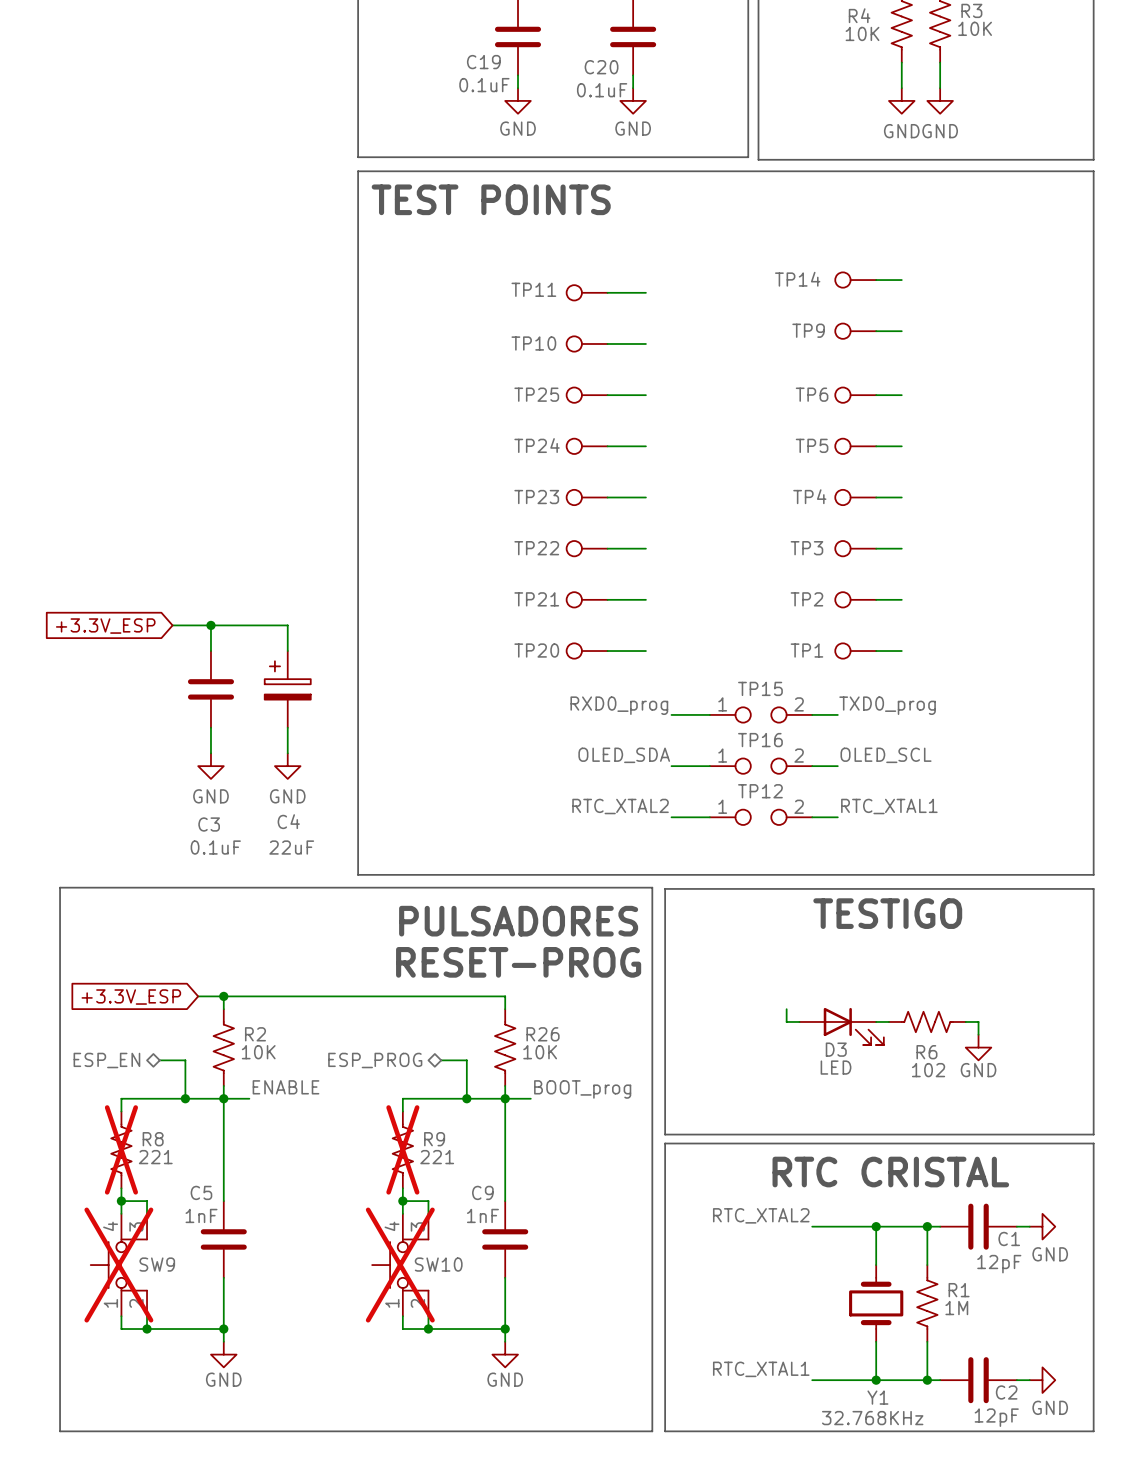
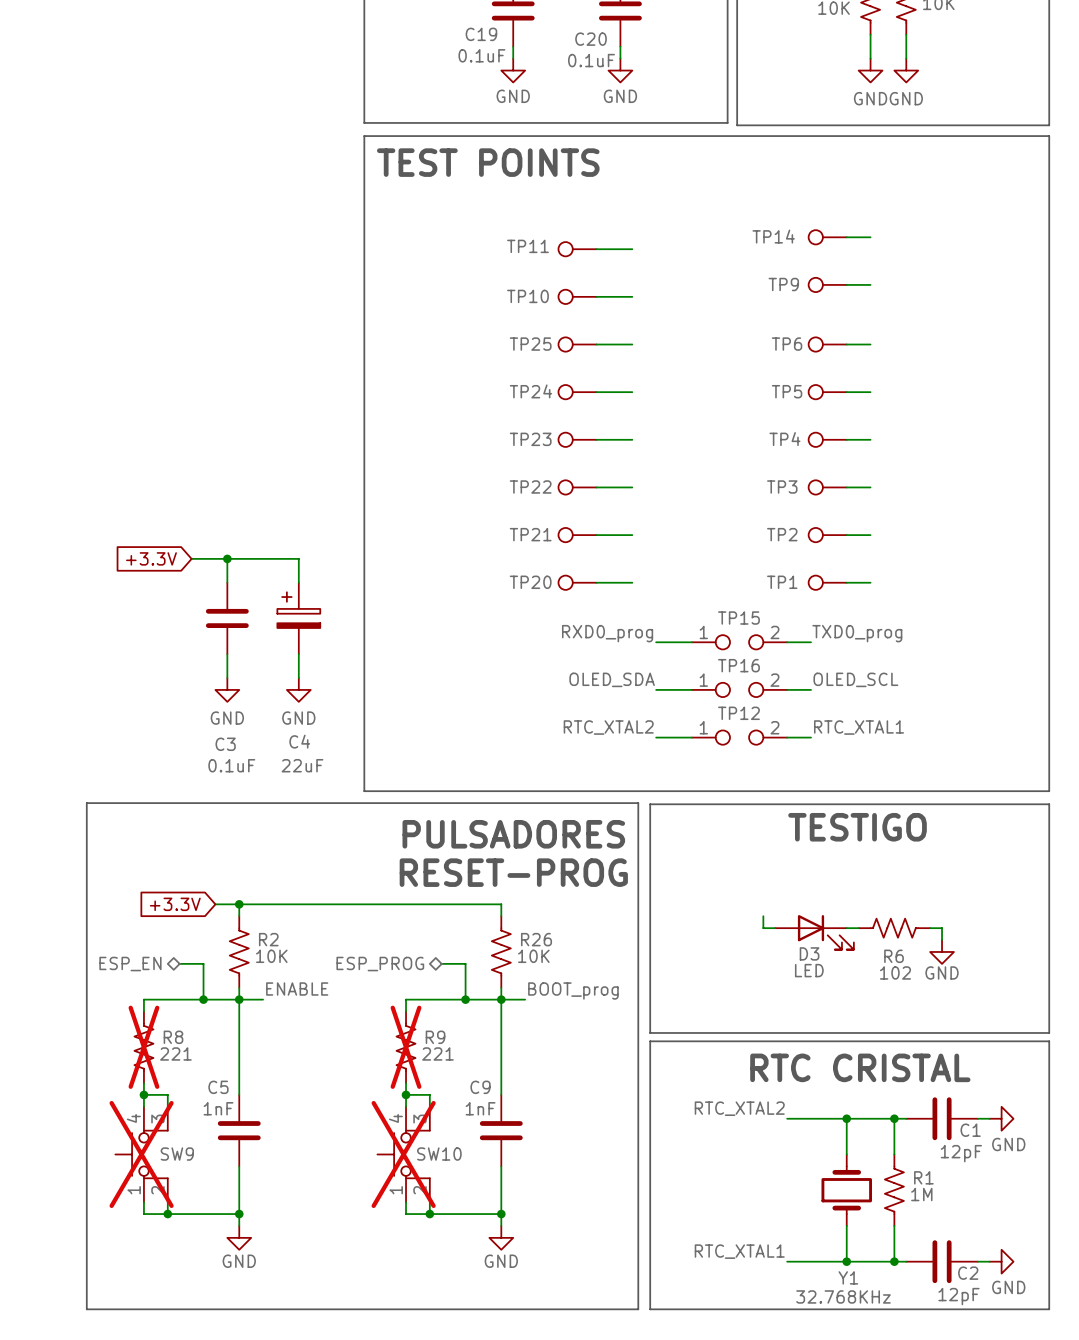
global label: +3.3V_ESP (105, 626) -> +3.3V (151, 558)
global label: +3.3V_ESP (131, 997) -> +3.3V (175, 904)

